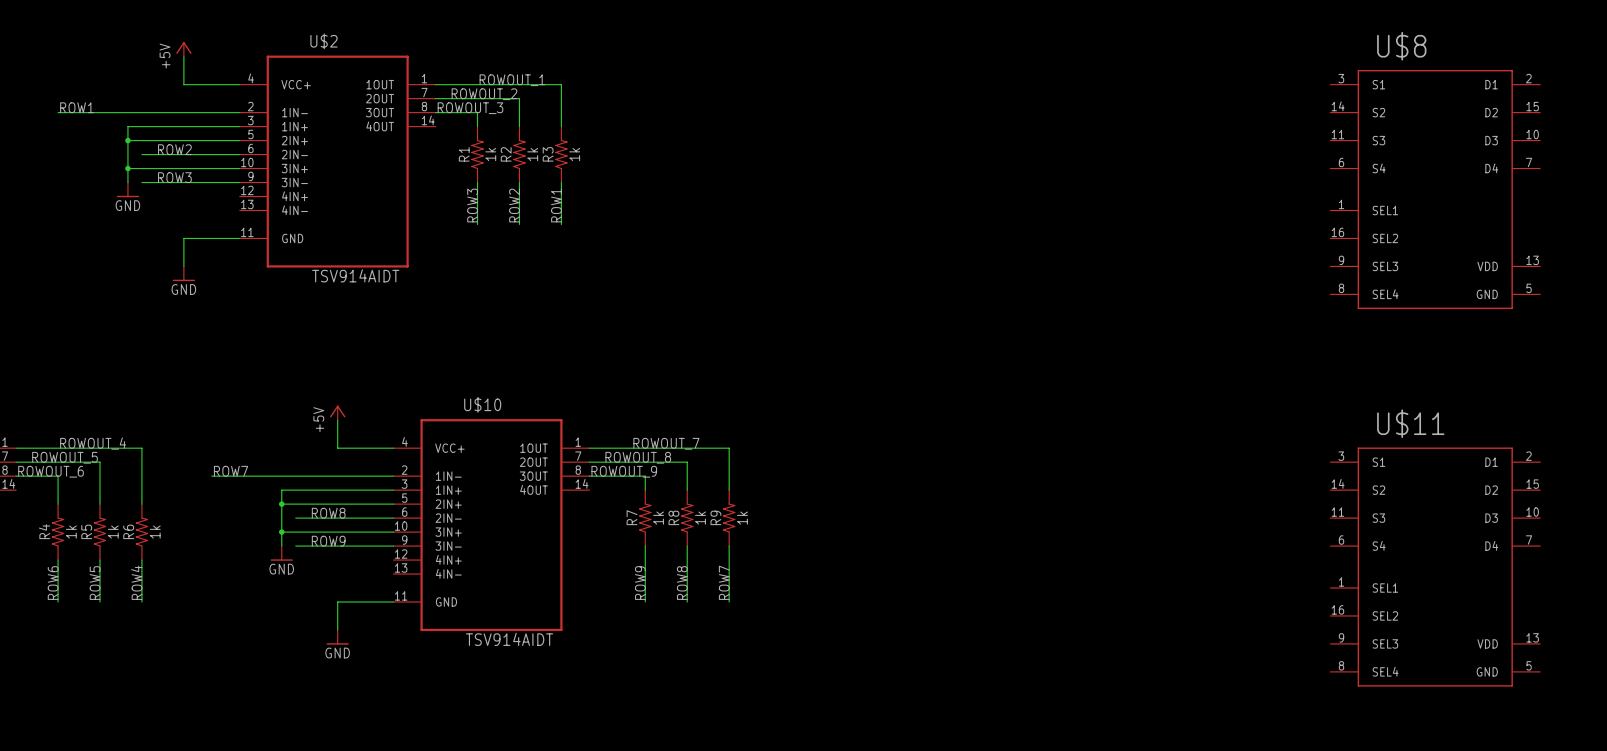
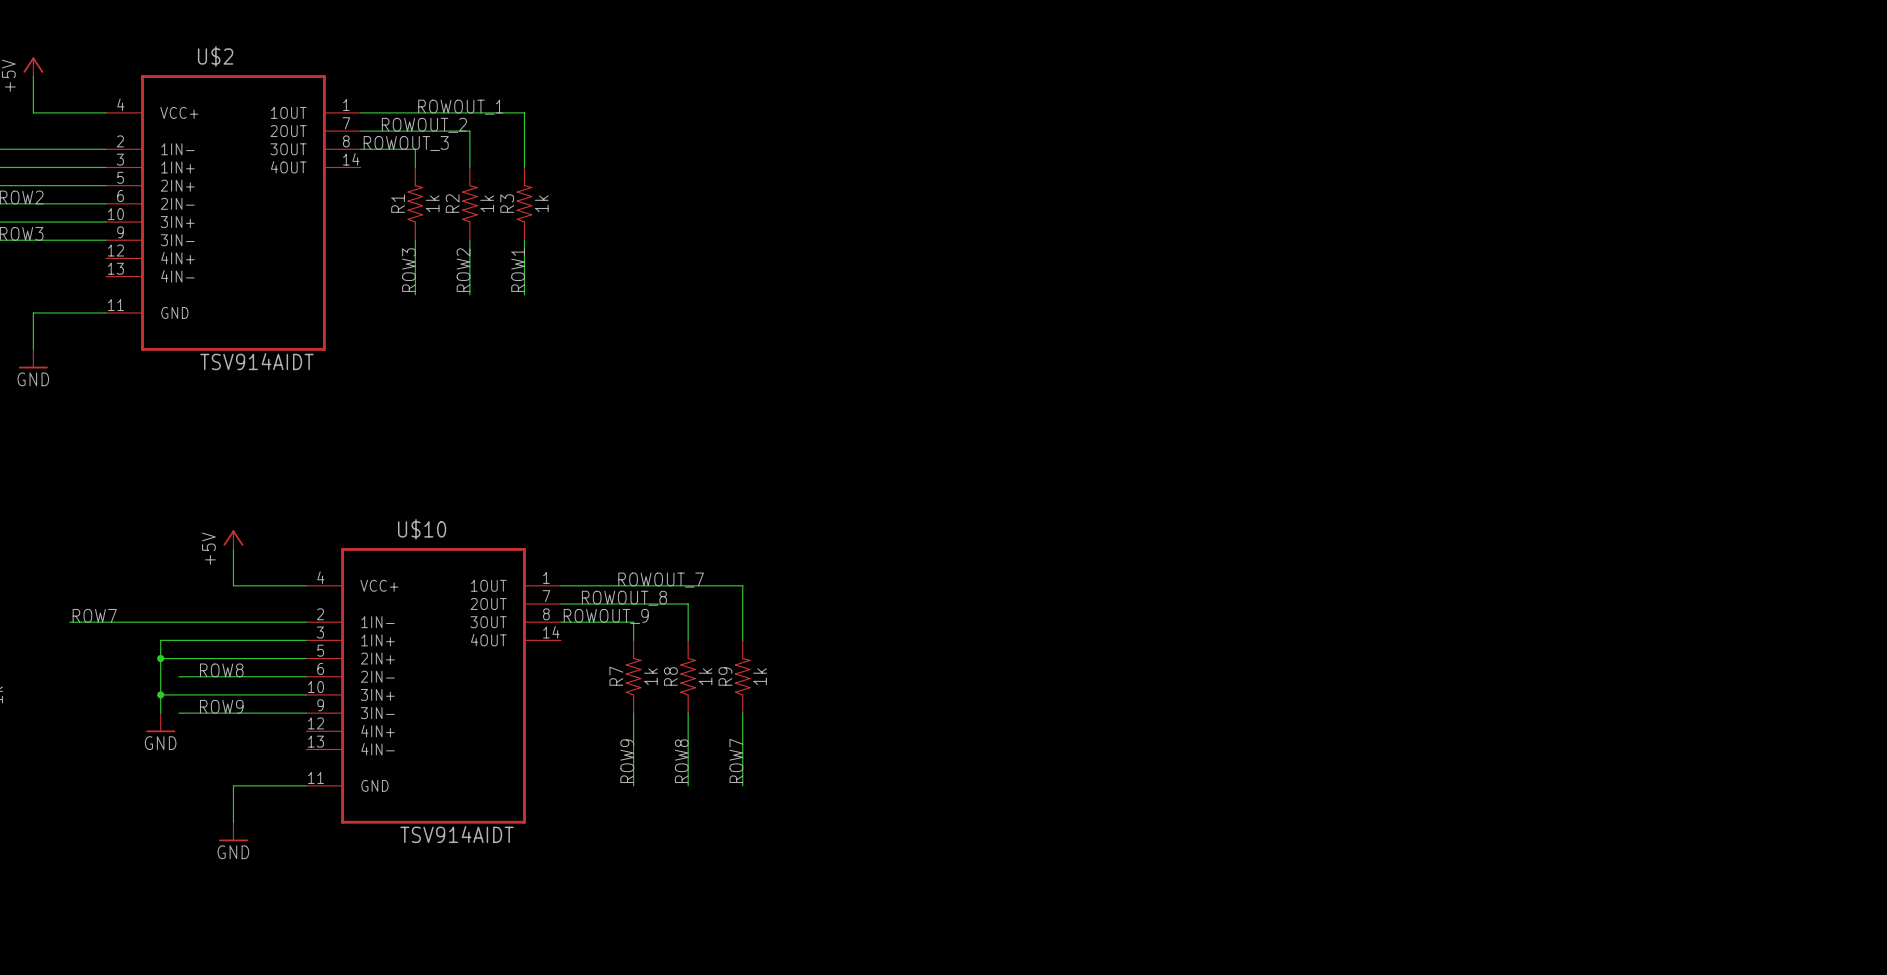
U$8: (1435, 189) -> none
U$11: (1435, 567) -> none

